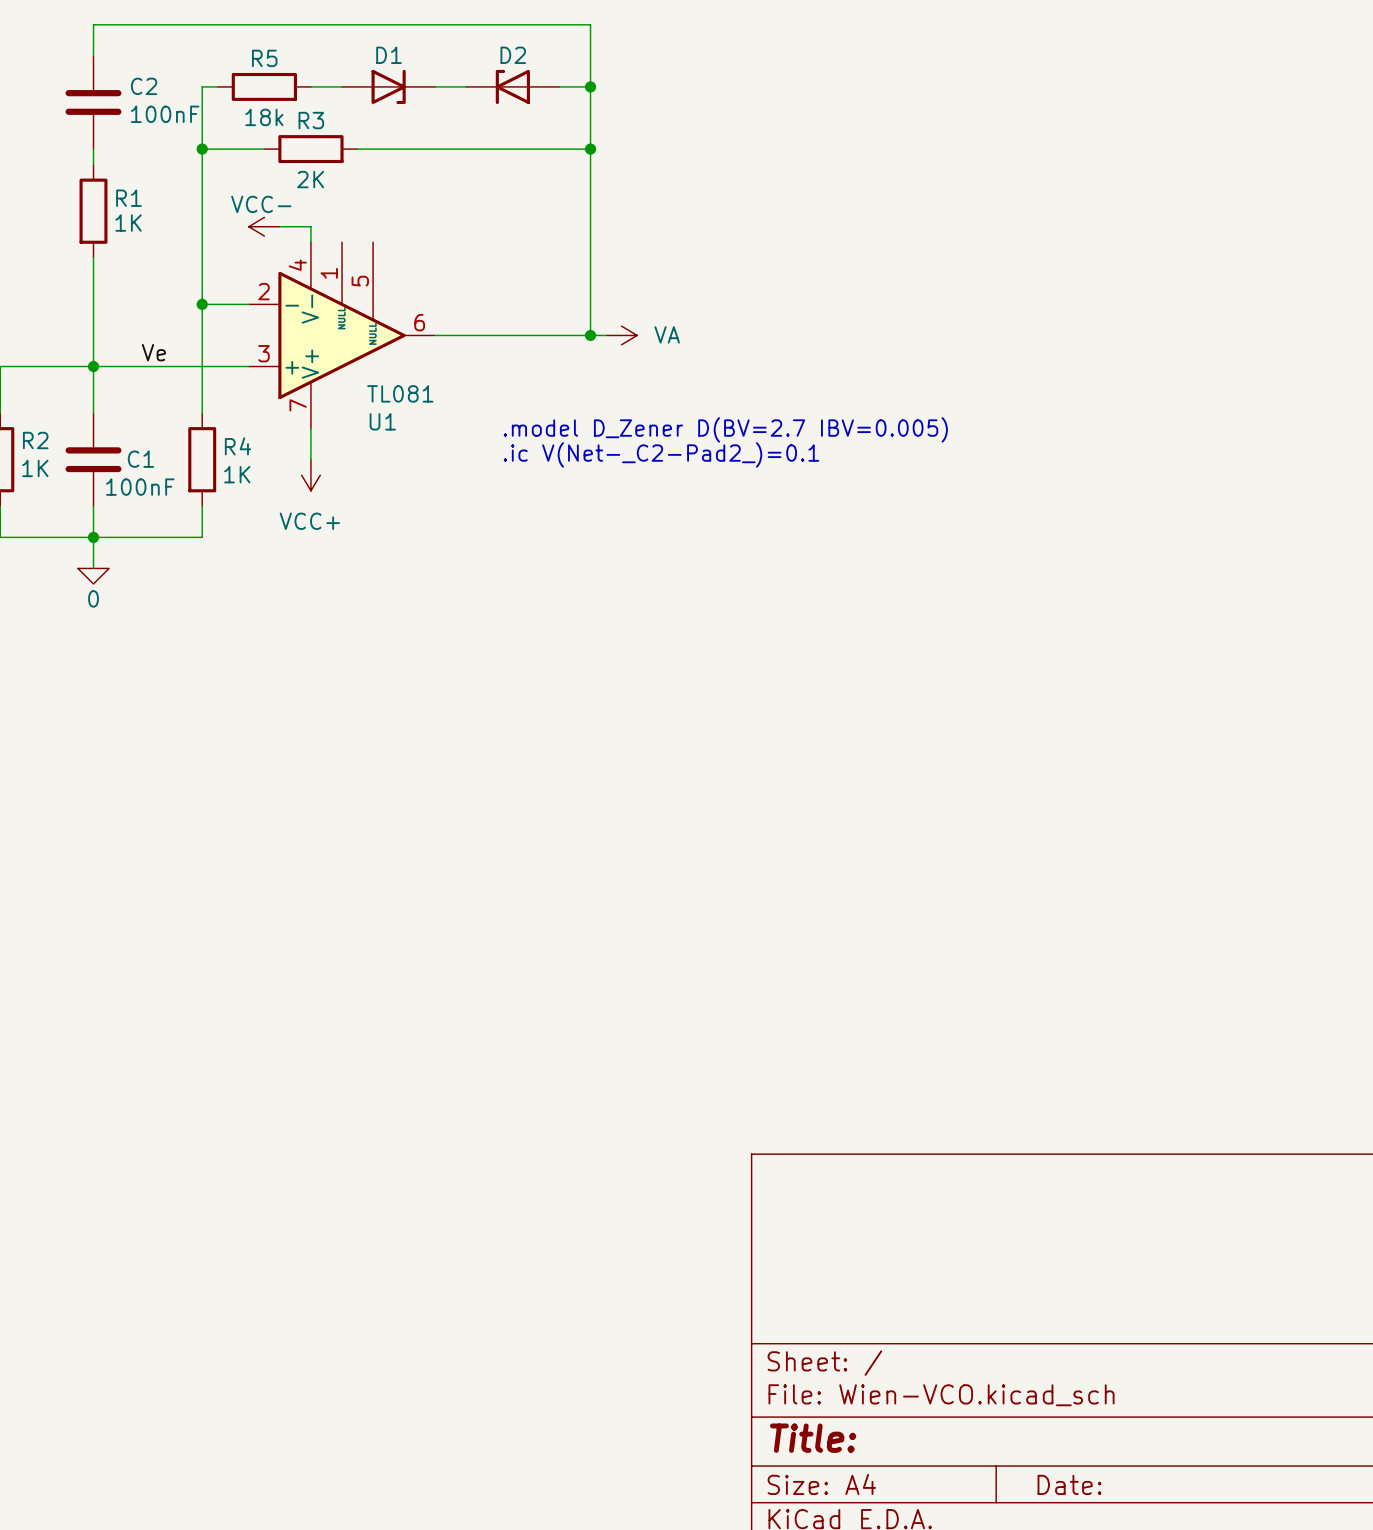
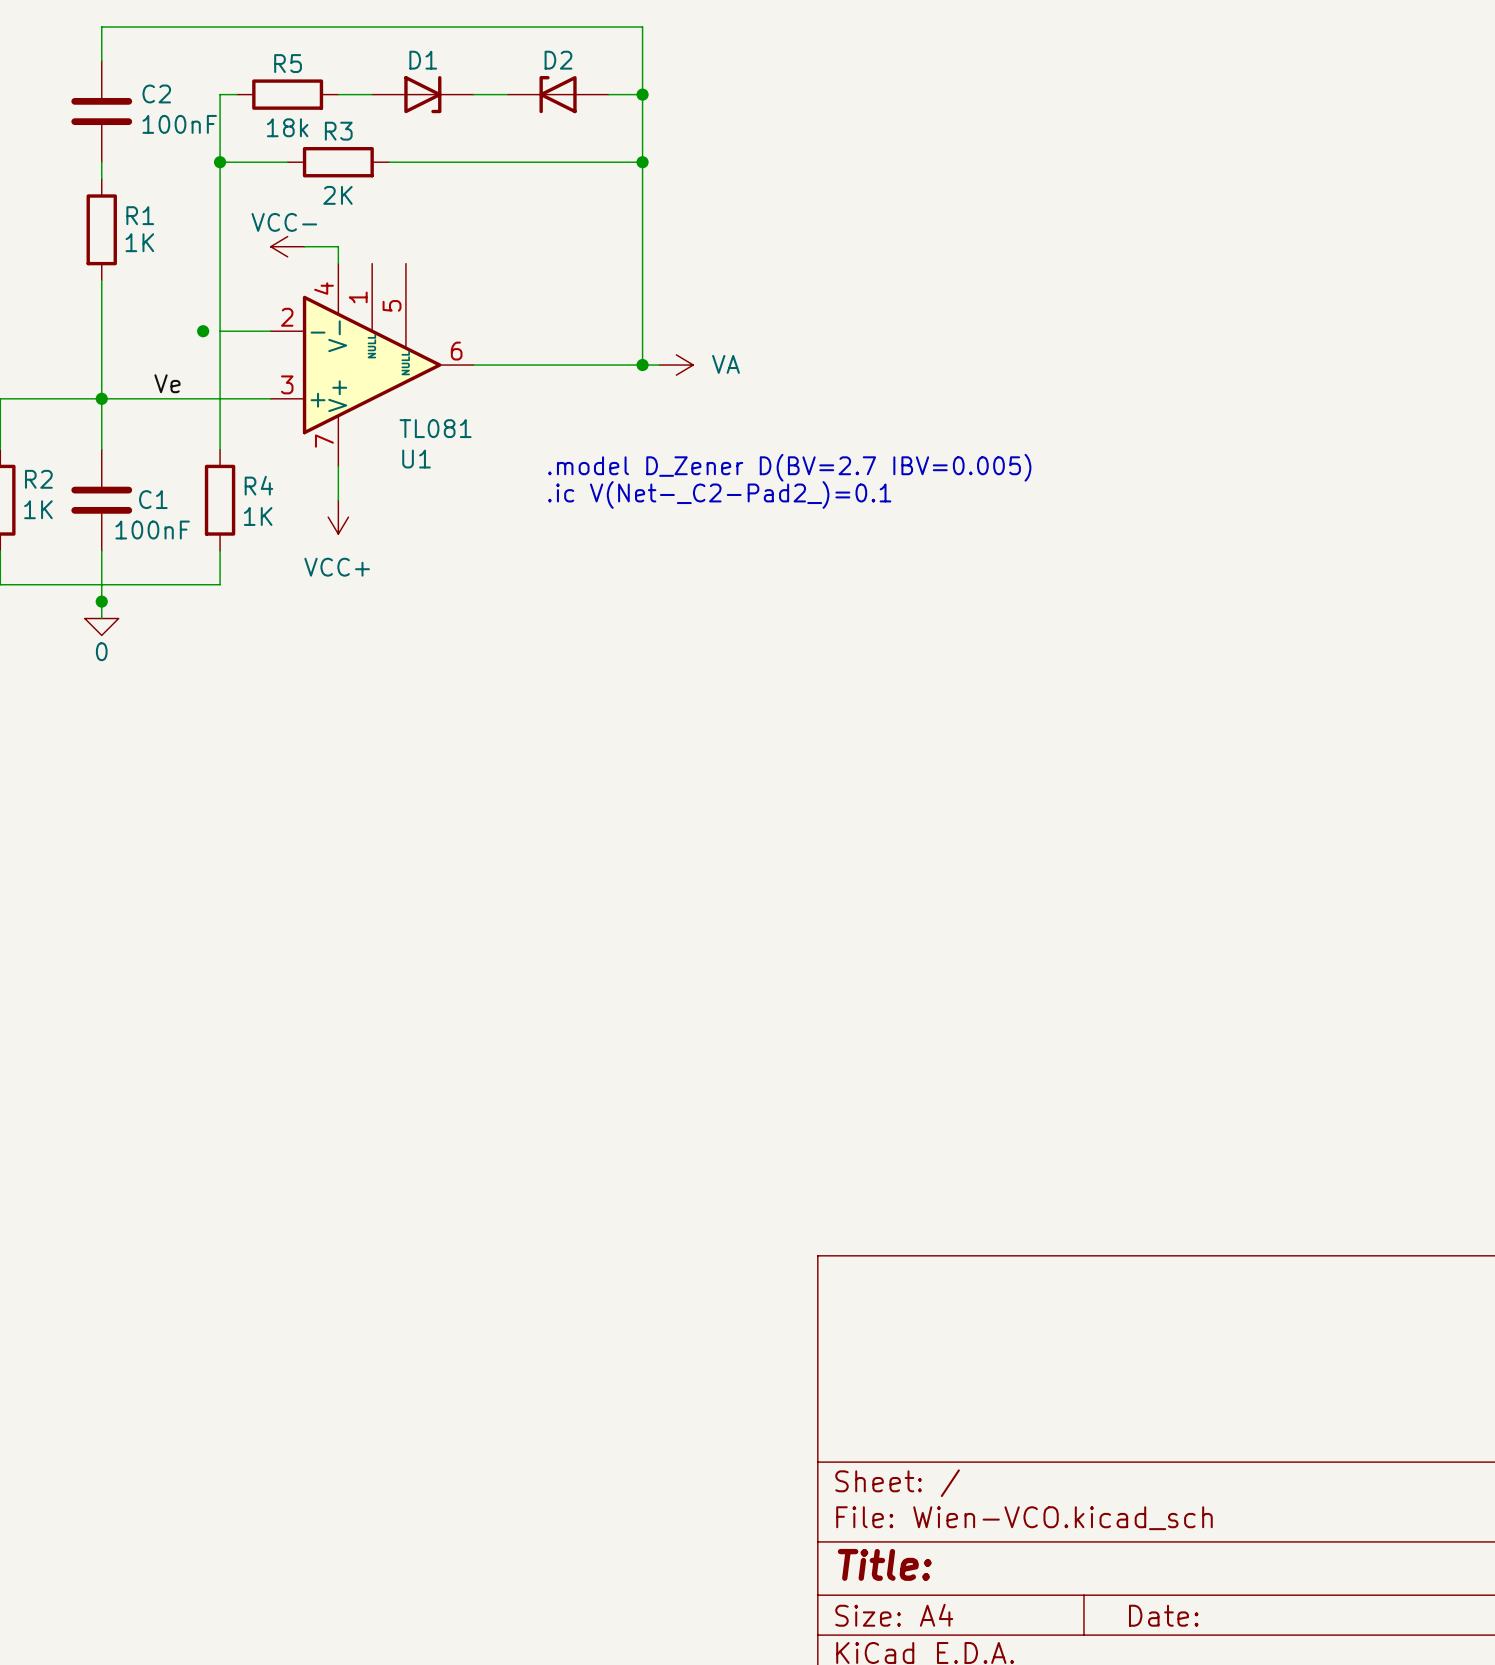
junction position: (202, 304) -> (203, 331)
junction position: (93, 537) -> (101, 601)

